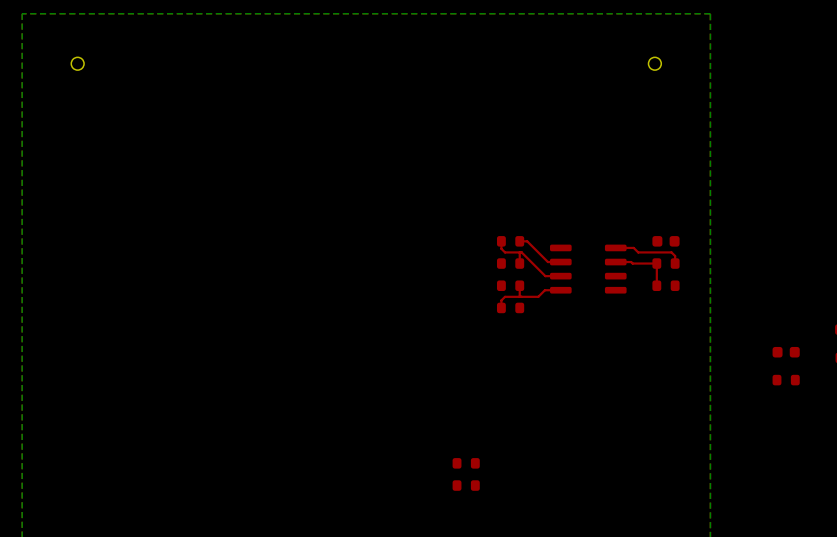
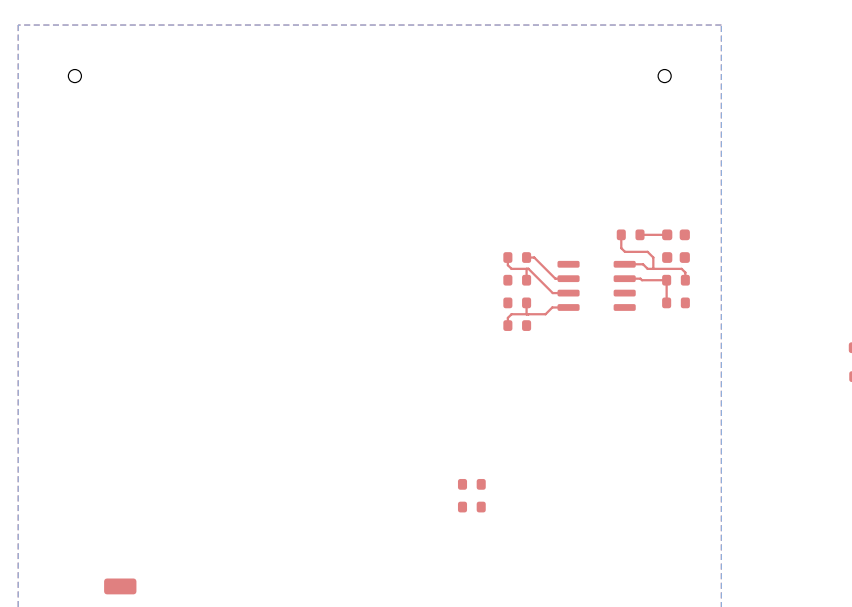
top track: none -> (621, 234) (621, 248) (624, 251) (647, 251) (653, 257) (653, 268)
top track: none -> (667, 234) (639, 234)
part position: (786, 352) -> (676, 234)
part position: (786, 380) -> (630, 234)

